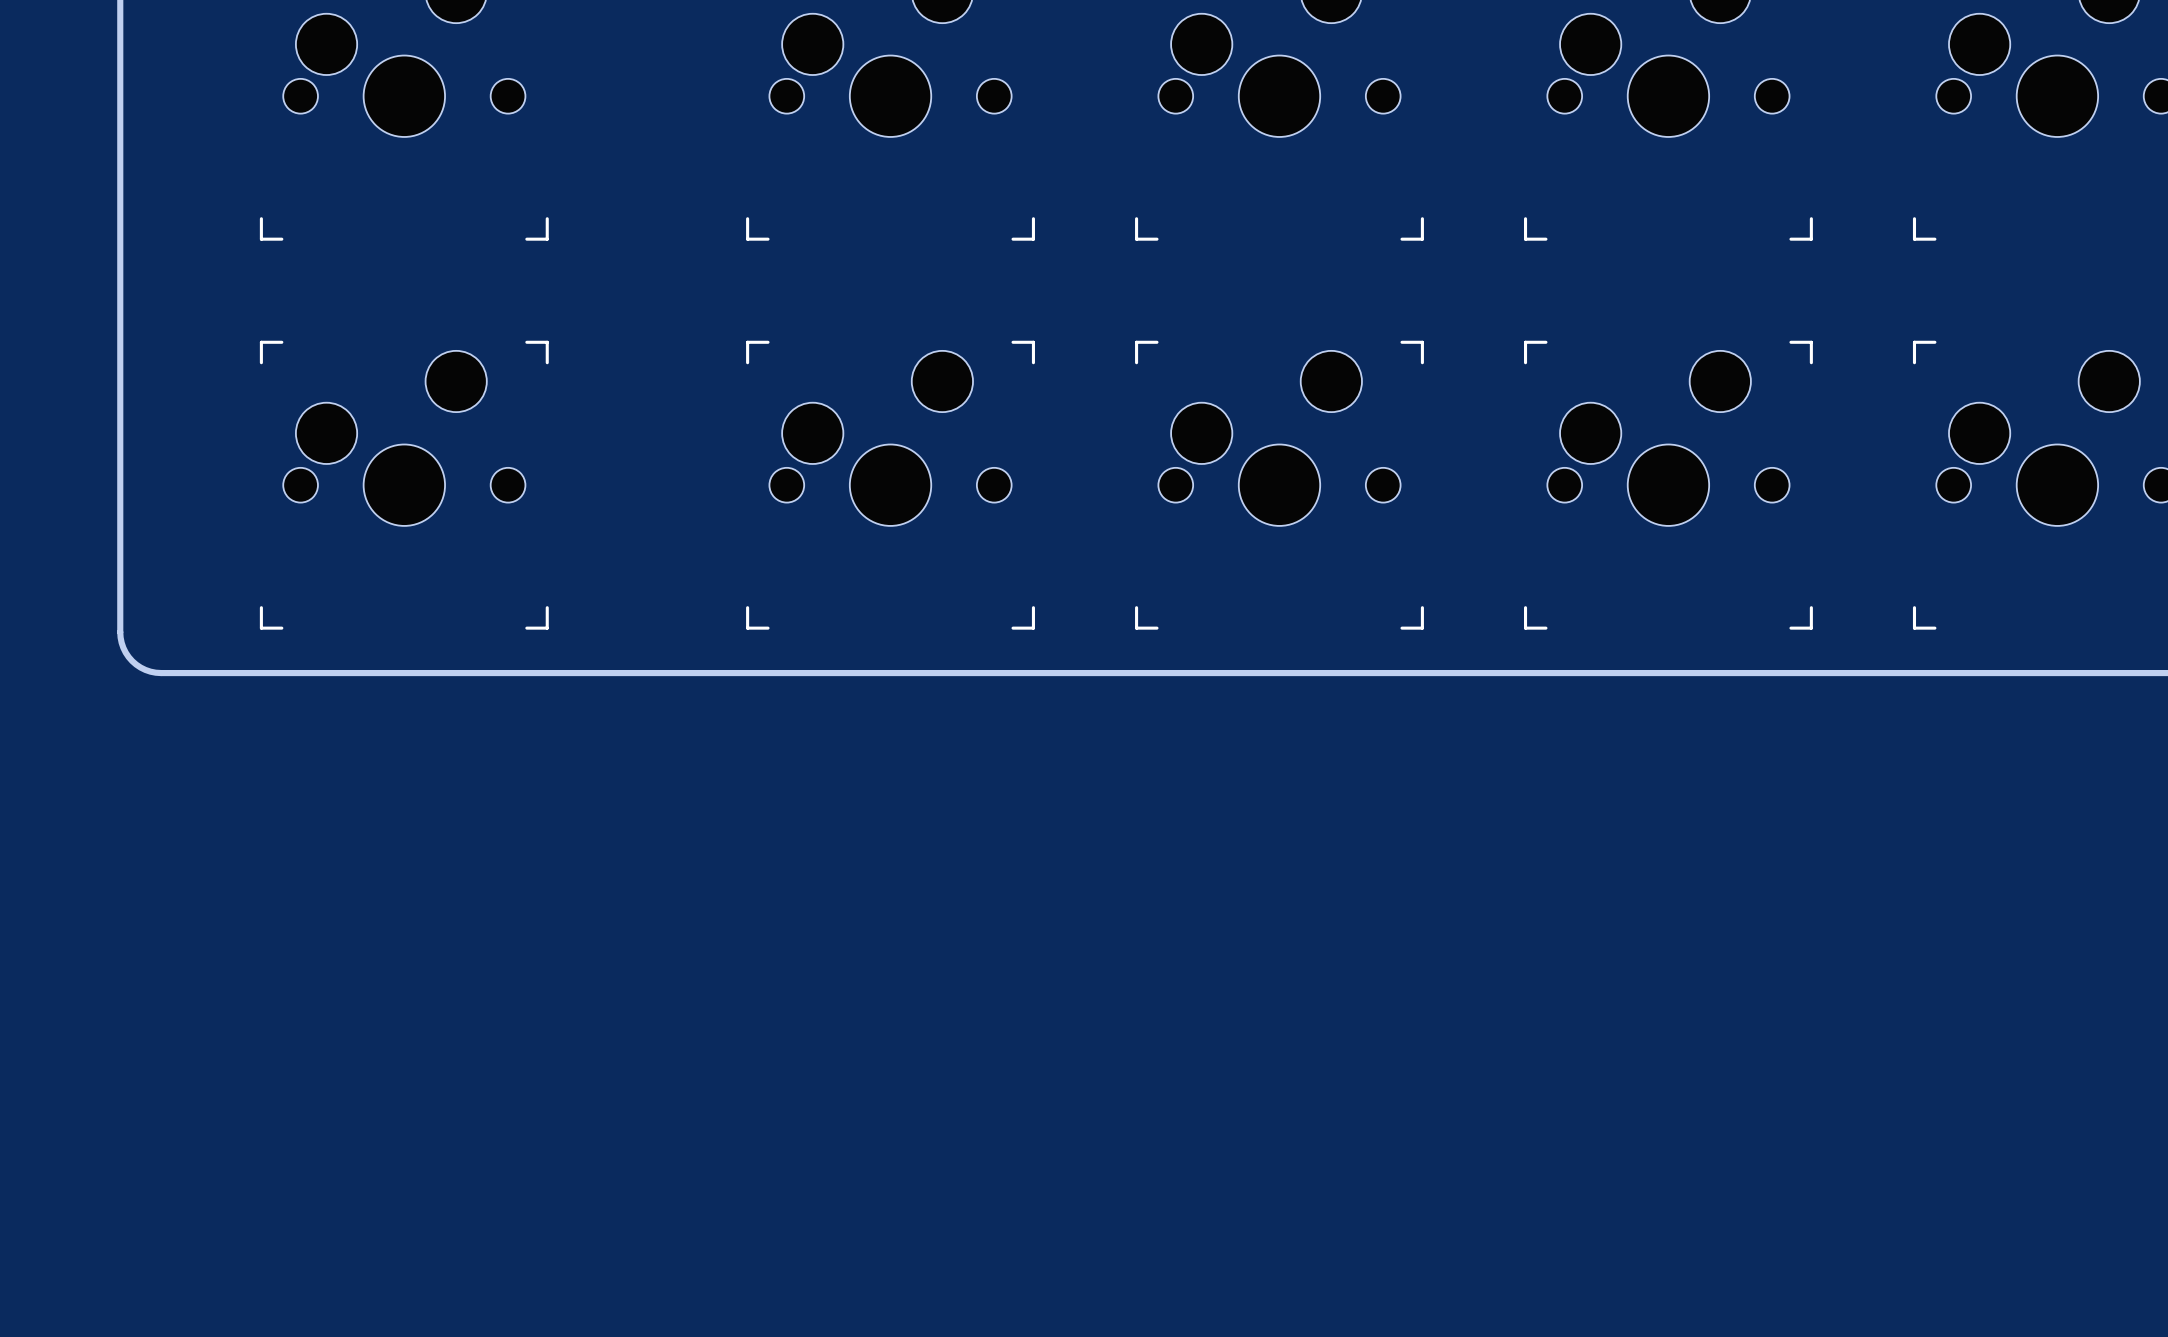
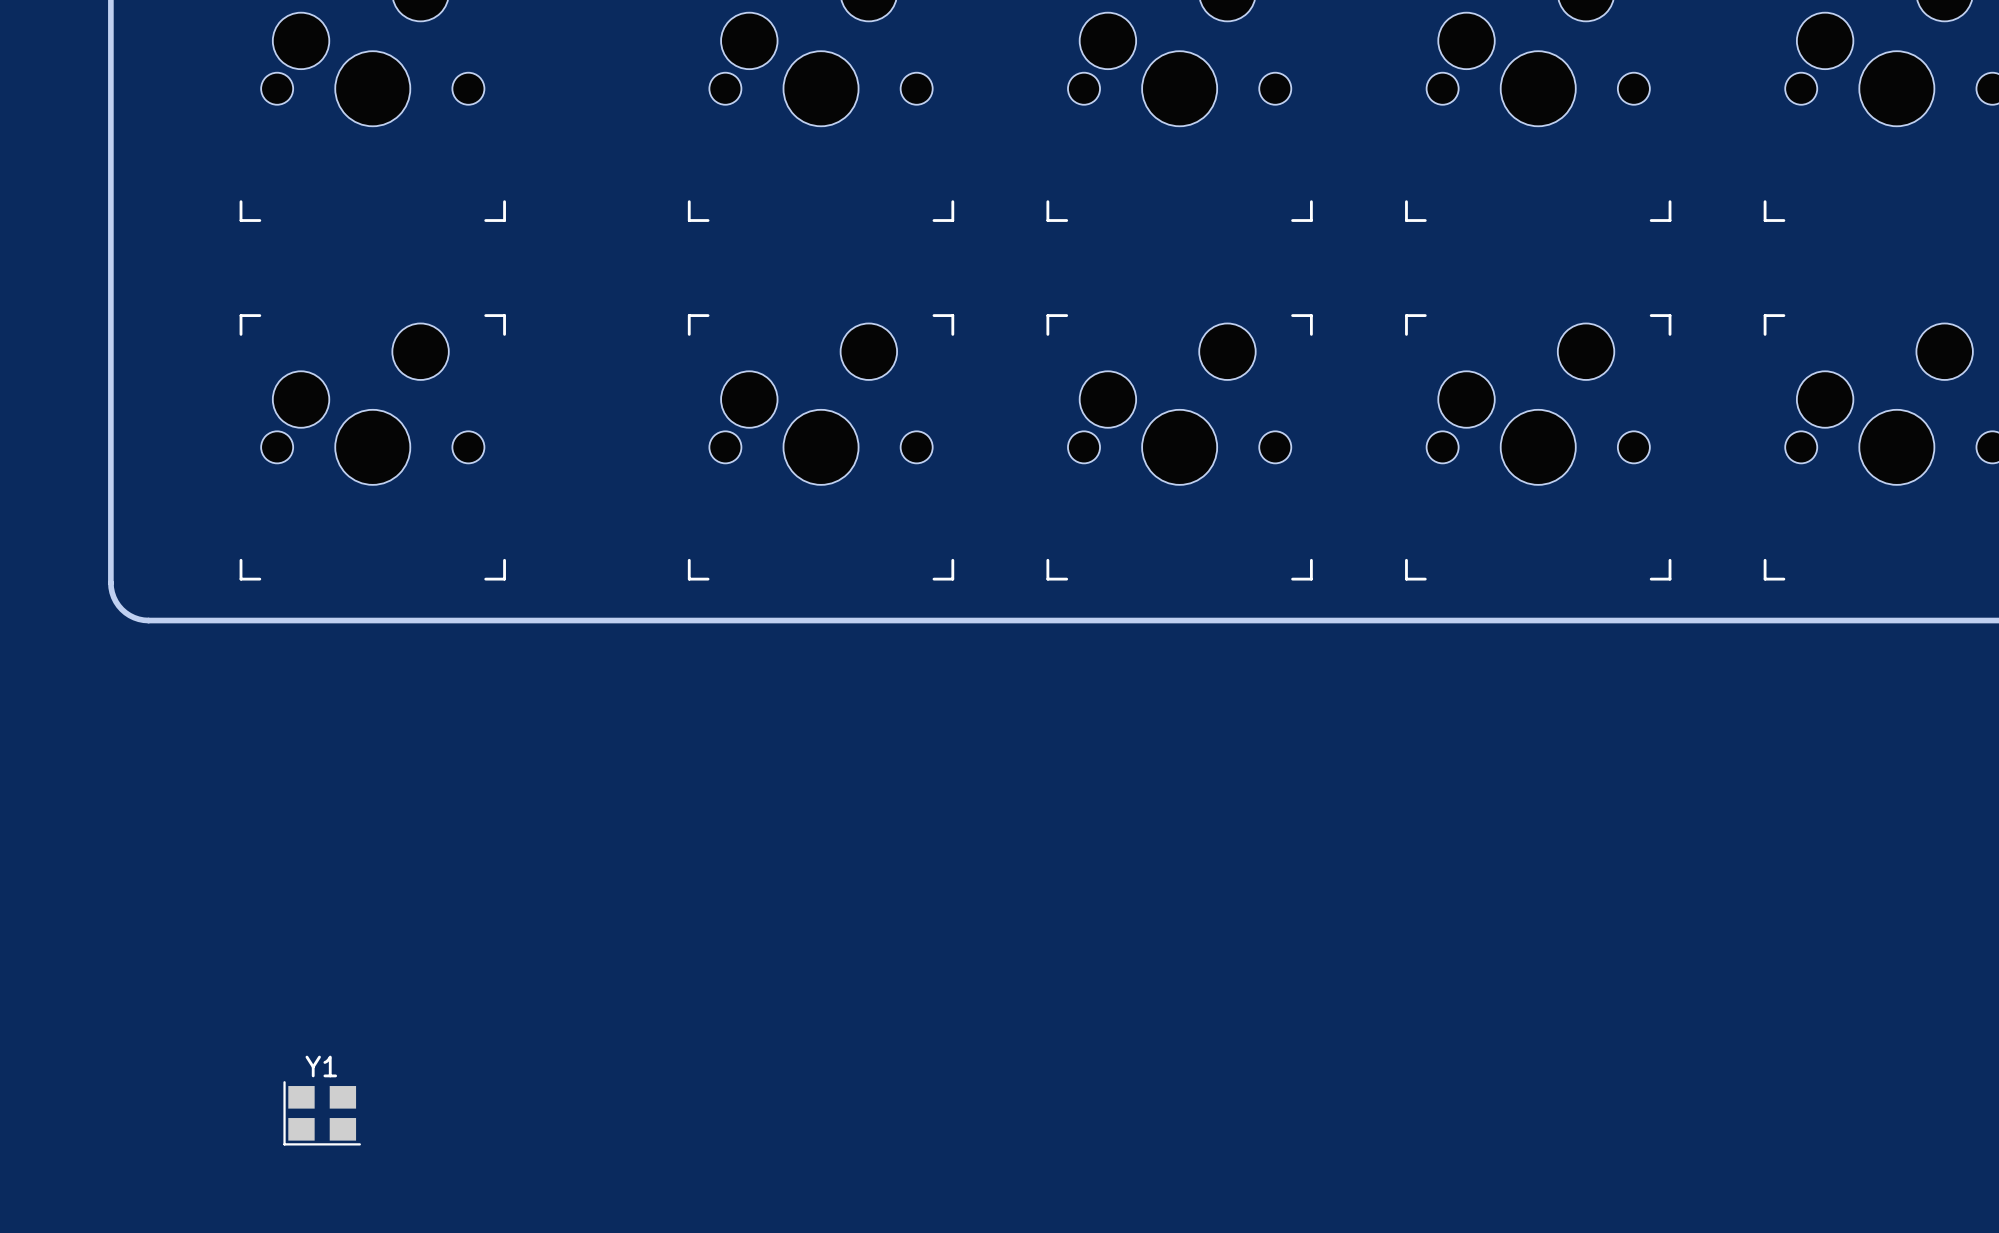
Y1: none -> (322, 1113)

